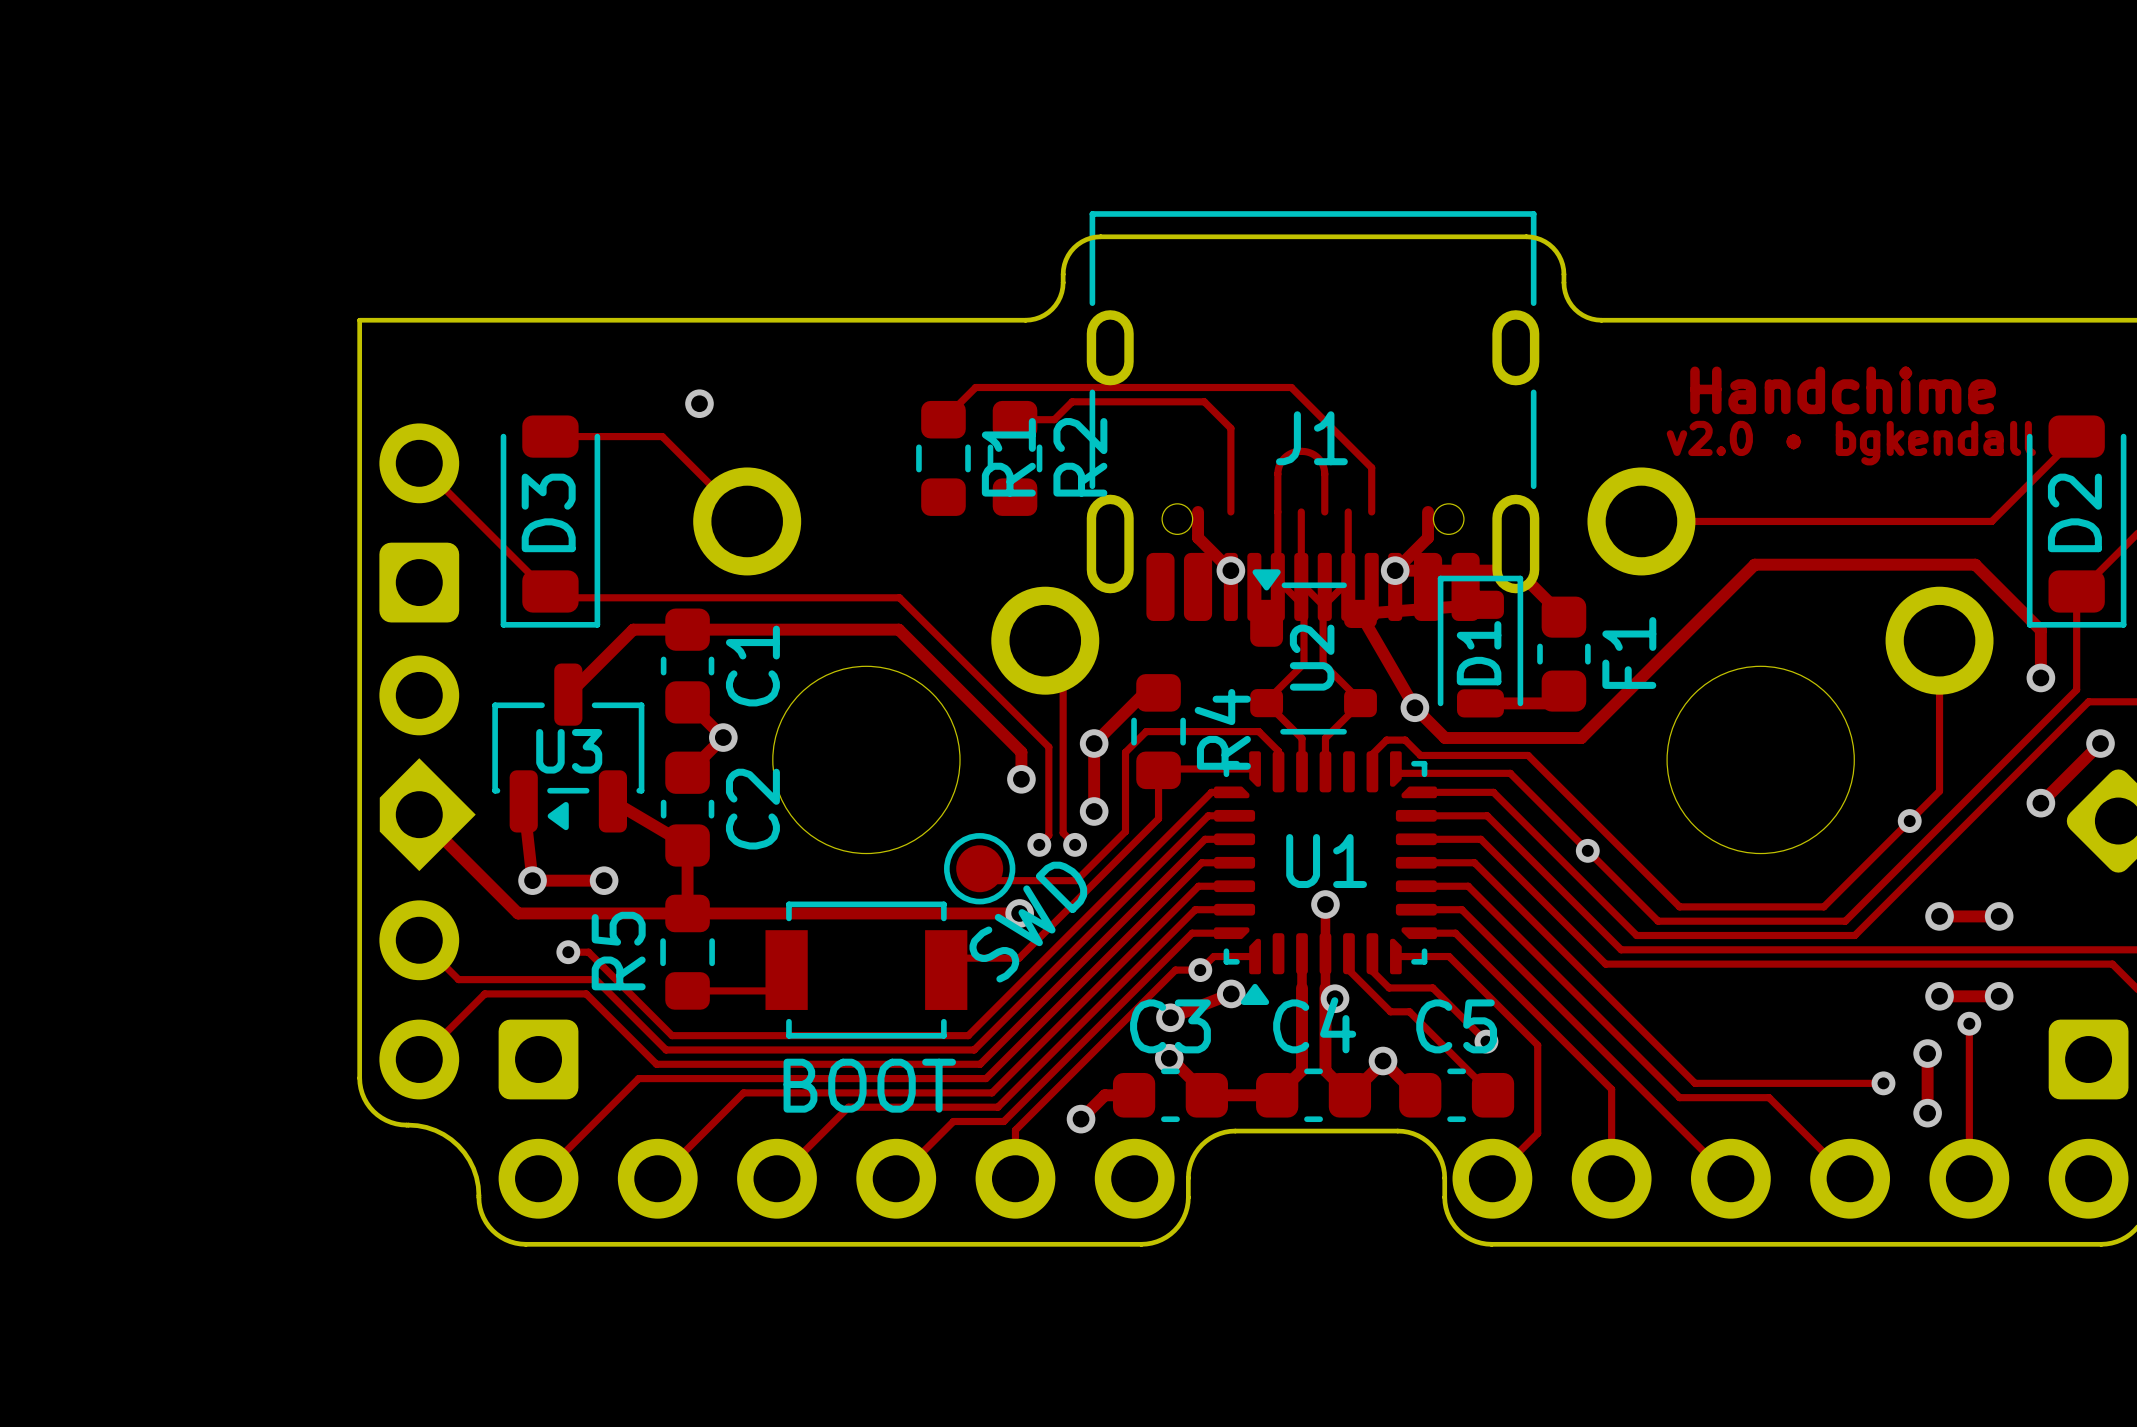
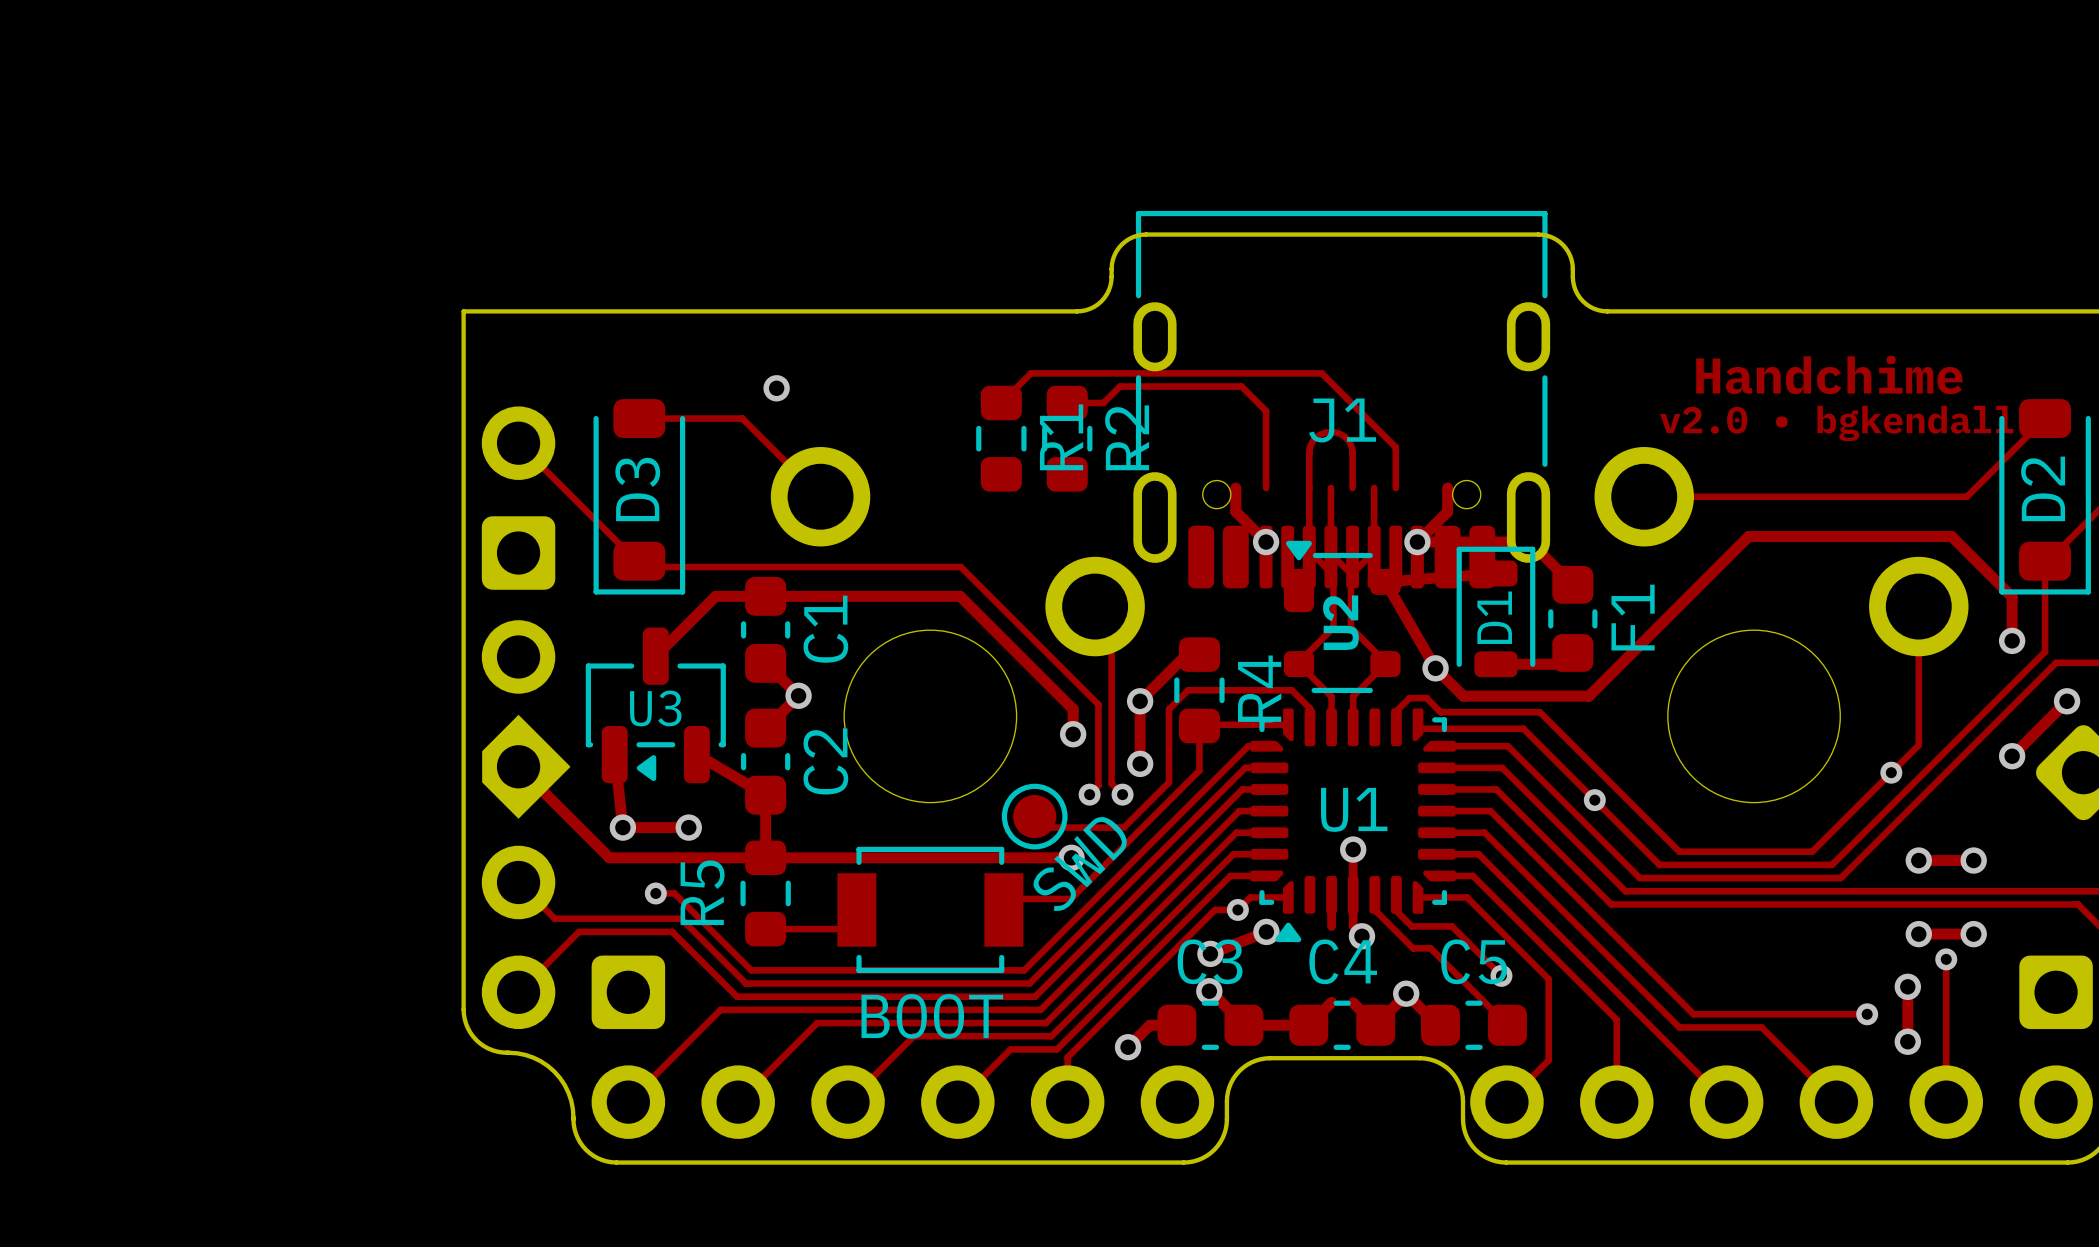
track: (1302, 987) (1302, 1070) -> none
track: (1325, 987) (1325, 1070) -> none

